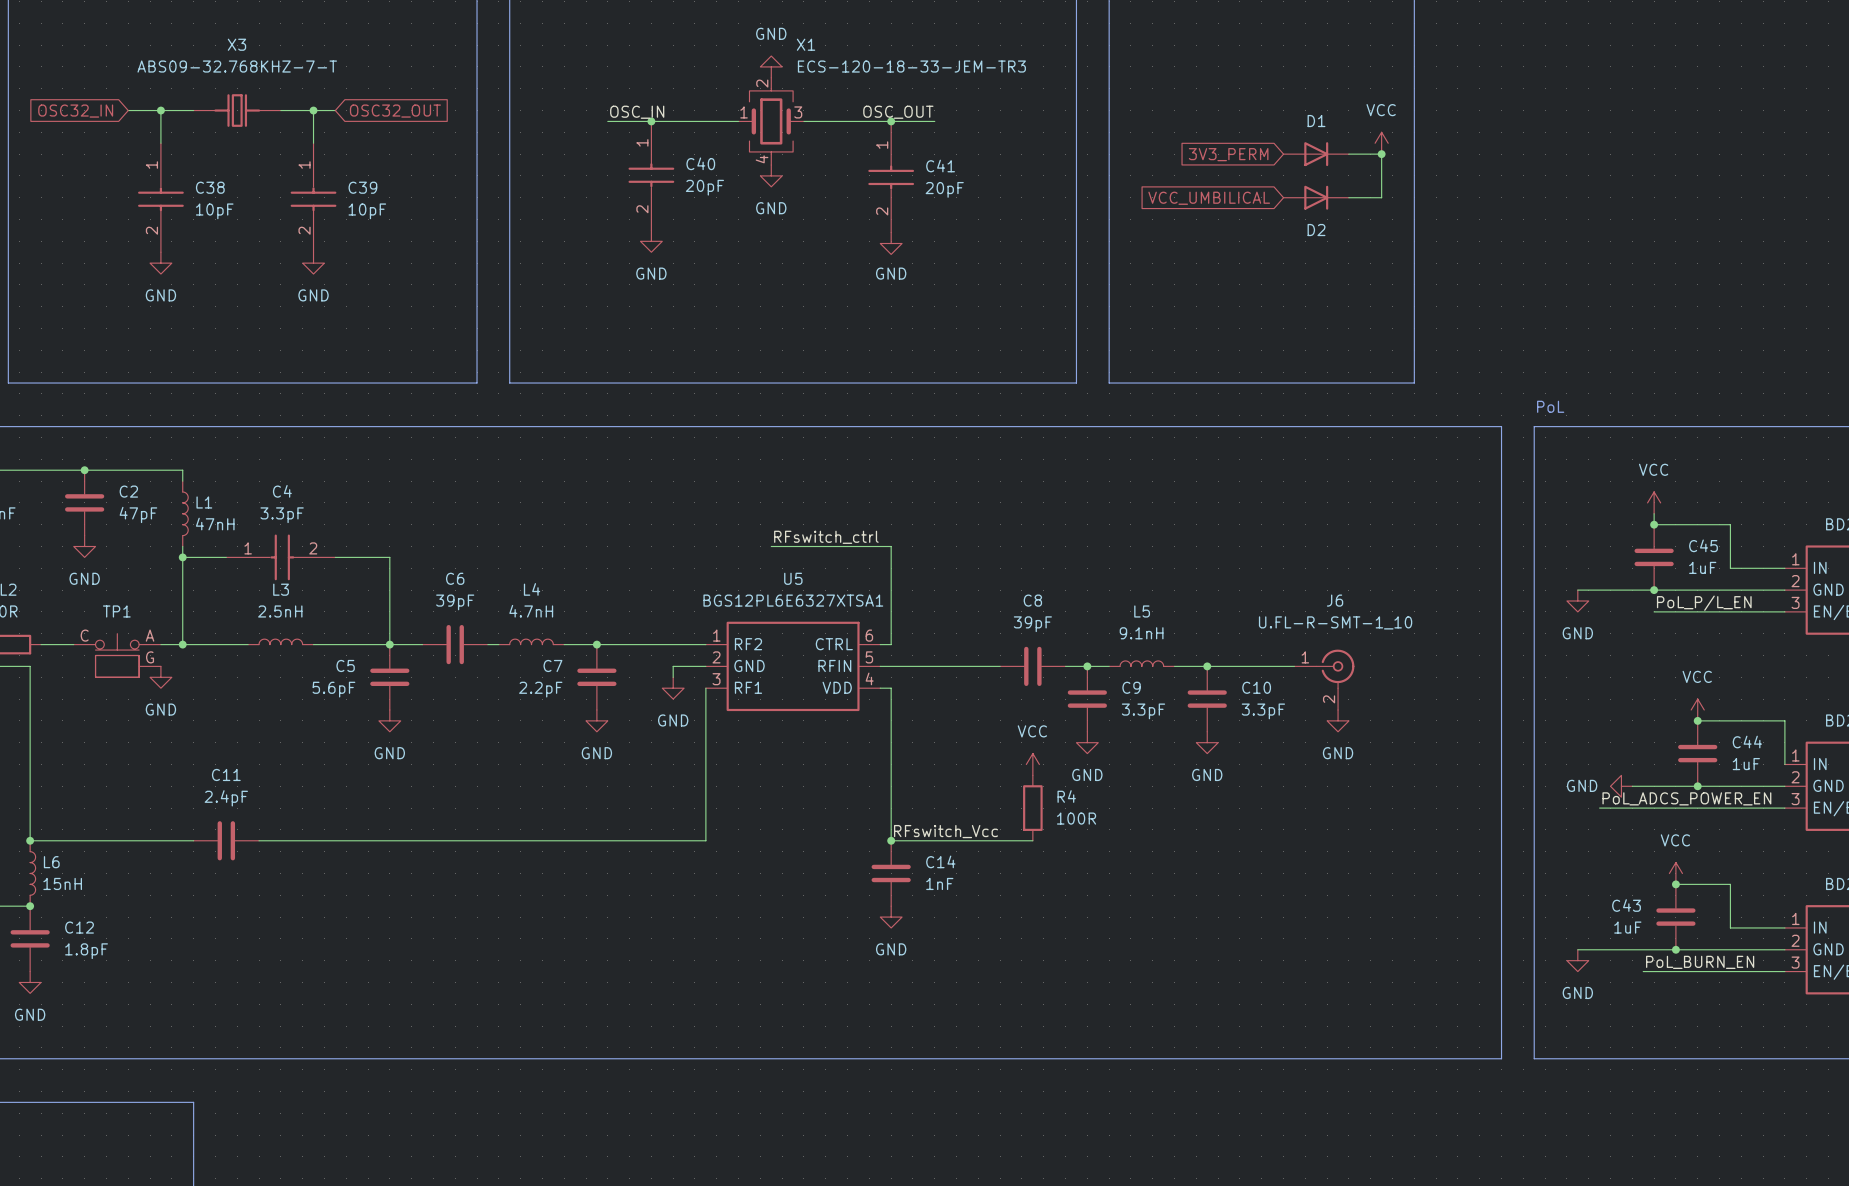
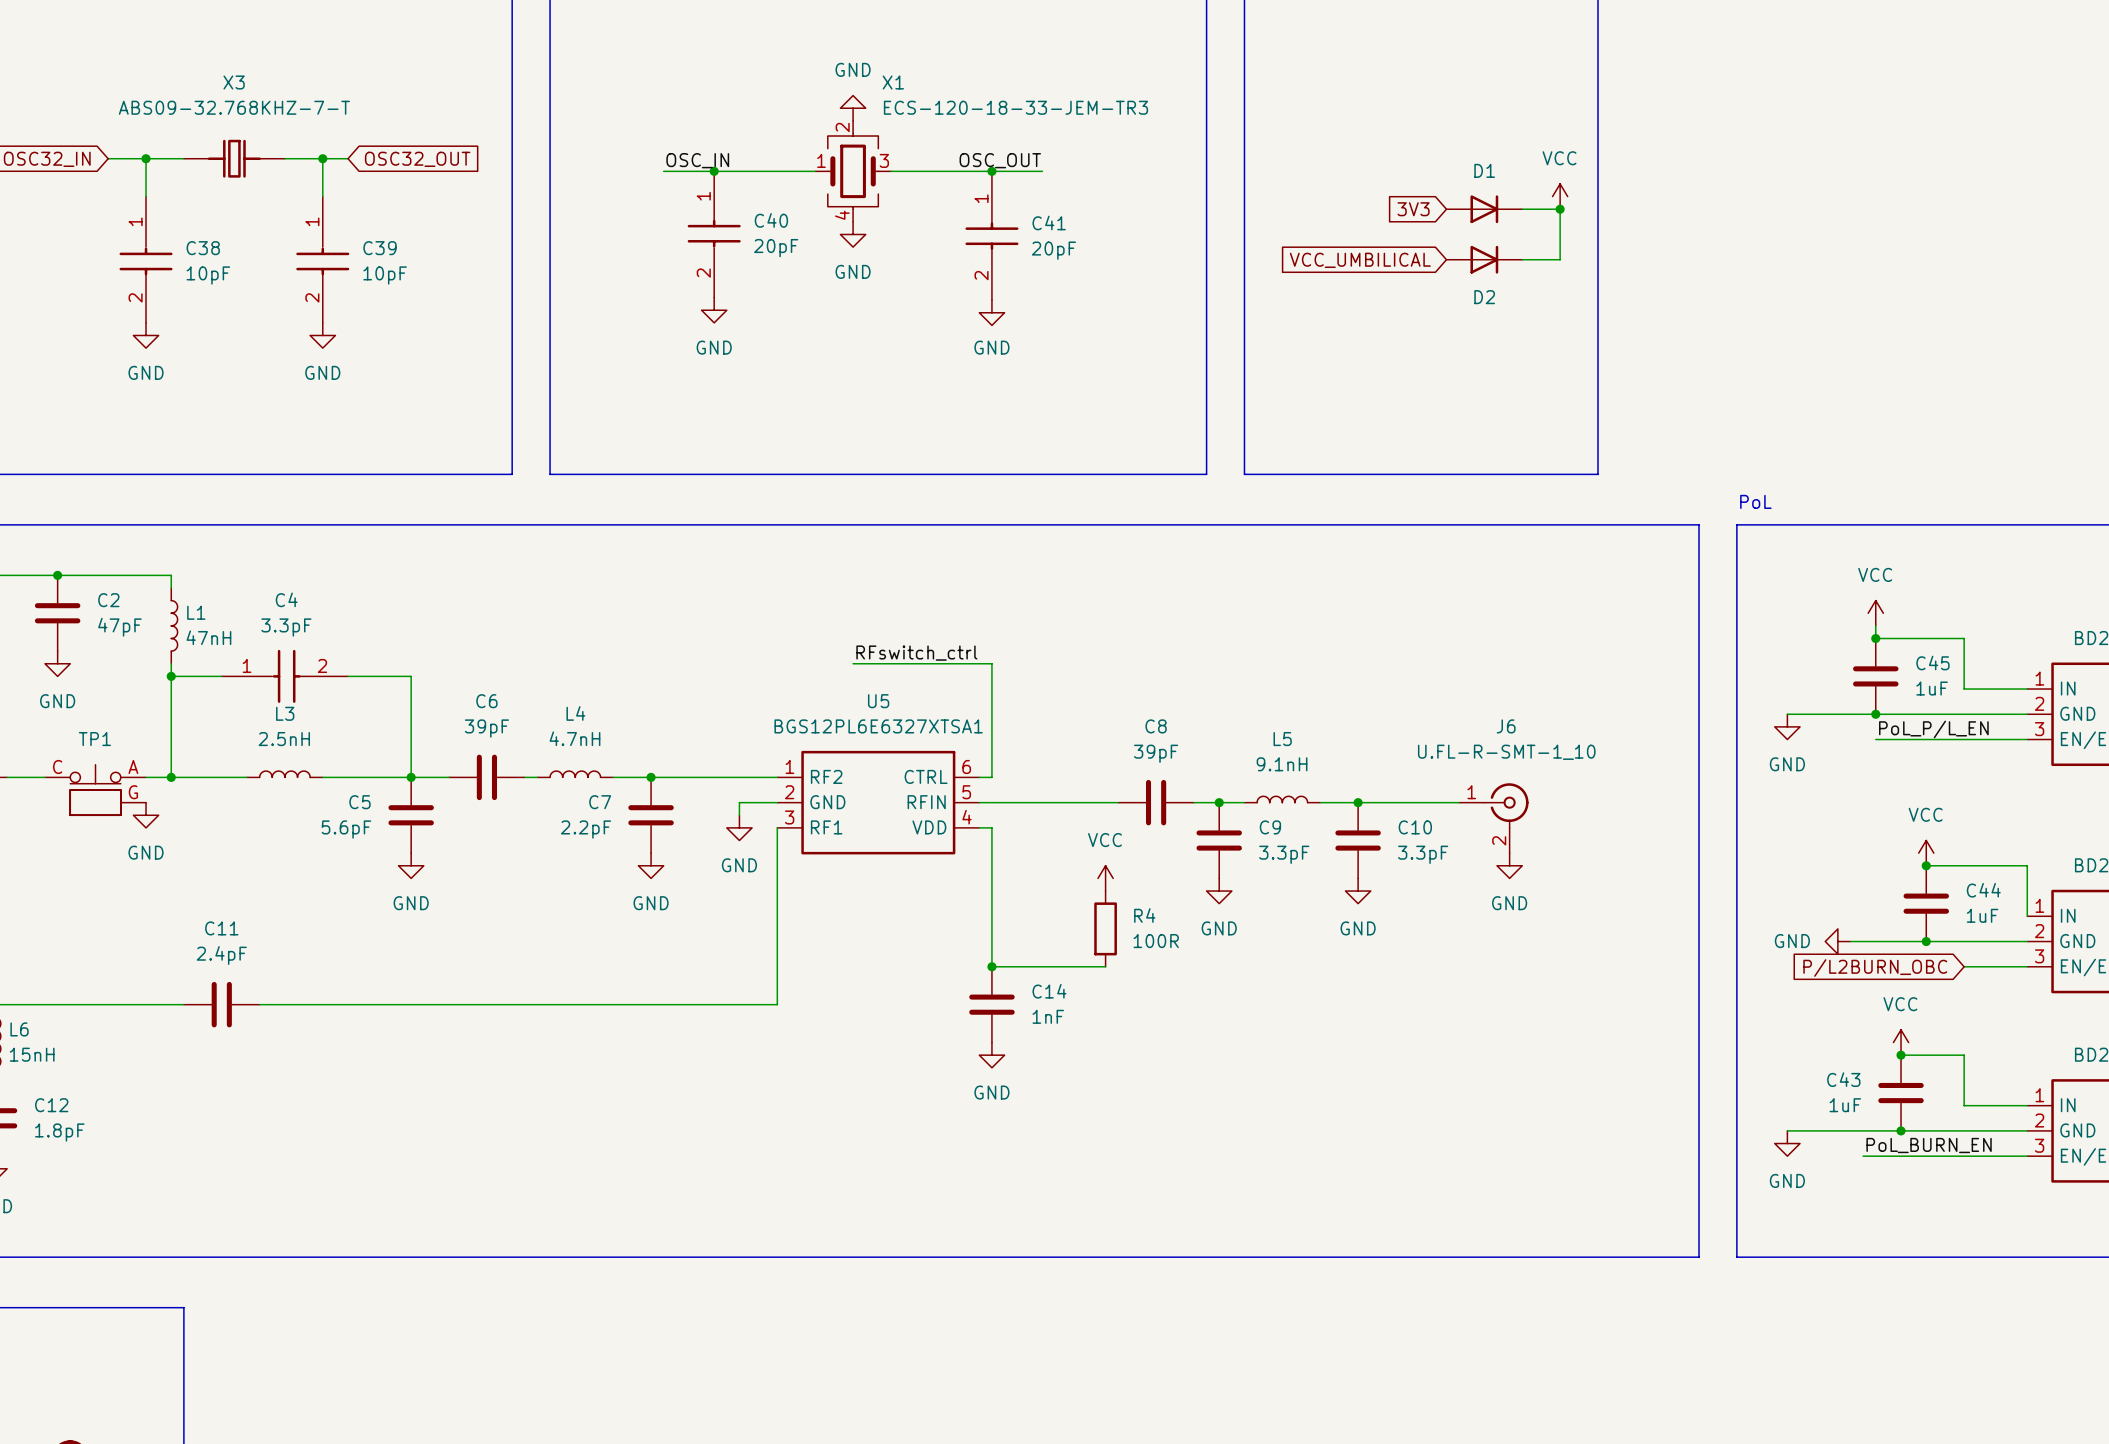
global label: 3V3_PERM (1228, 154) -> 3V3 (1413, 209)
power symbol position: VCC (1032, 764) -> VCC (1105, 878)
label: PoL_ADCS_POWER_EN (1686, 798) -> none
wire: (891, 808) (891, 840) (1032, 840) -> (991, 966) (1105, 966)
R4 position: (1032, 808) -> (1105, 928)
wire: (1599, 808) (1730, 808) -> none
global label: none -> P/L2BURN_OBC (1875, 967)
label: RFswitch_Vcc (946, 831) -> none
junction position: (891, 840) -> (991, 966)
C14 position: (891, 873) -> (991, 1004)
power symbol position: GND (891, 917) -> GND (991, 1055)

